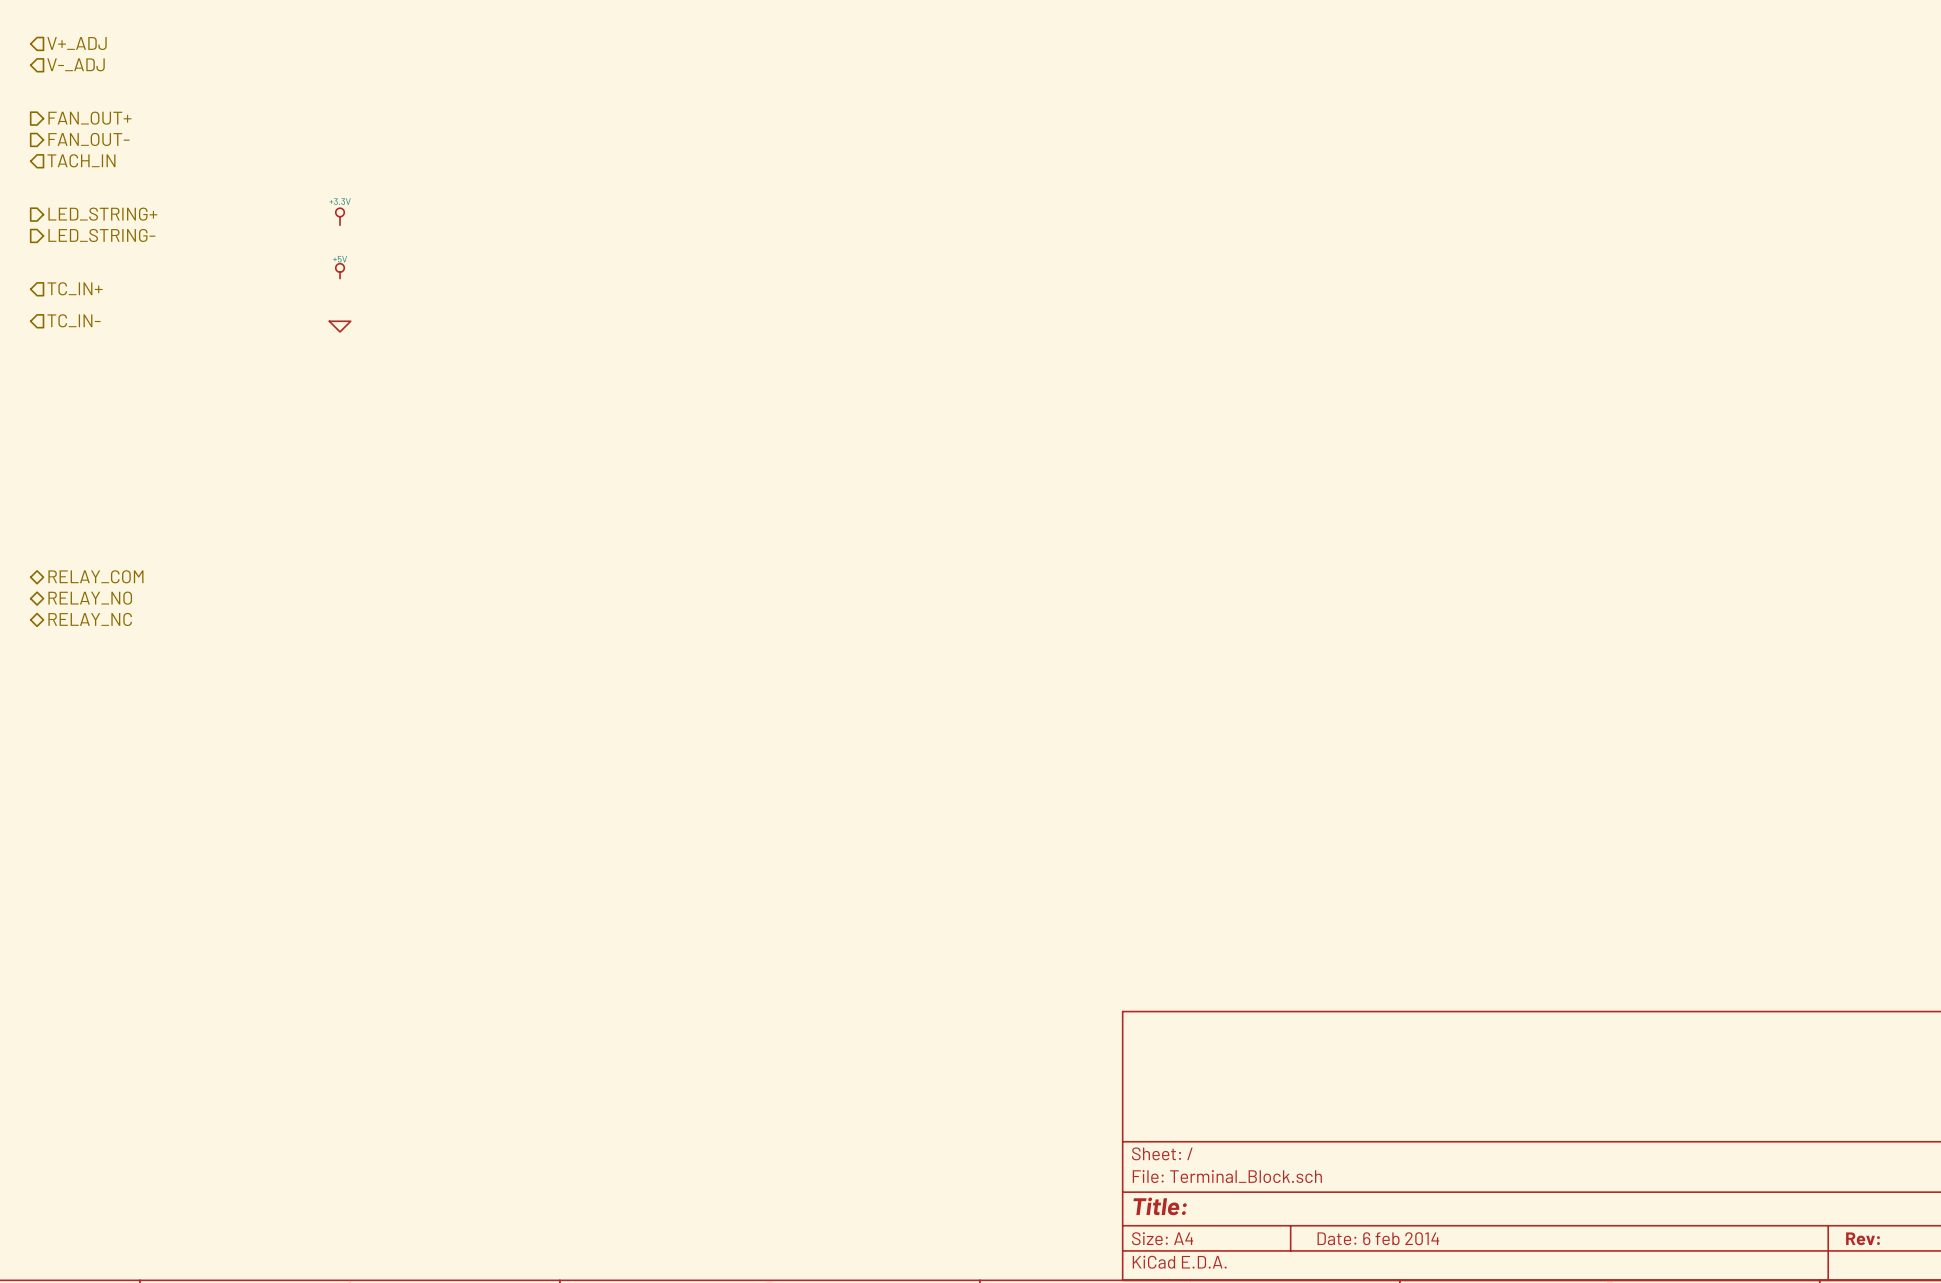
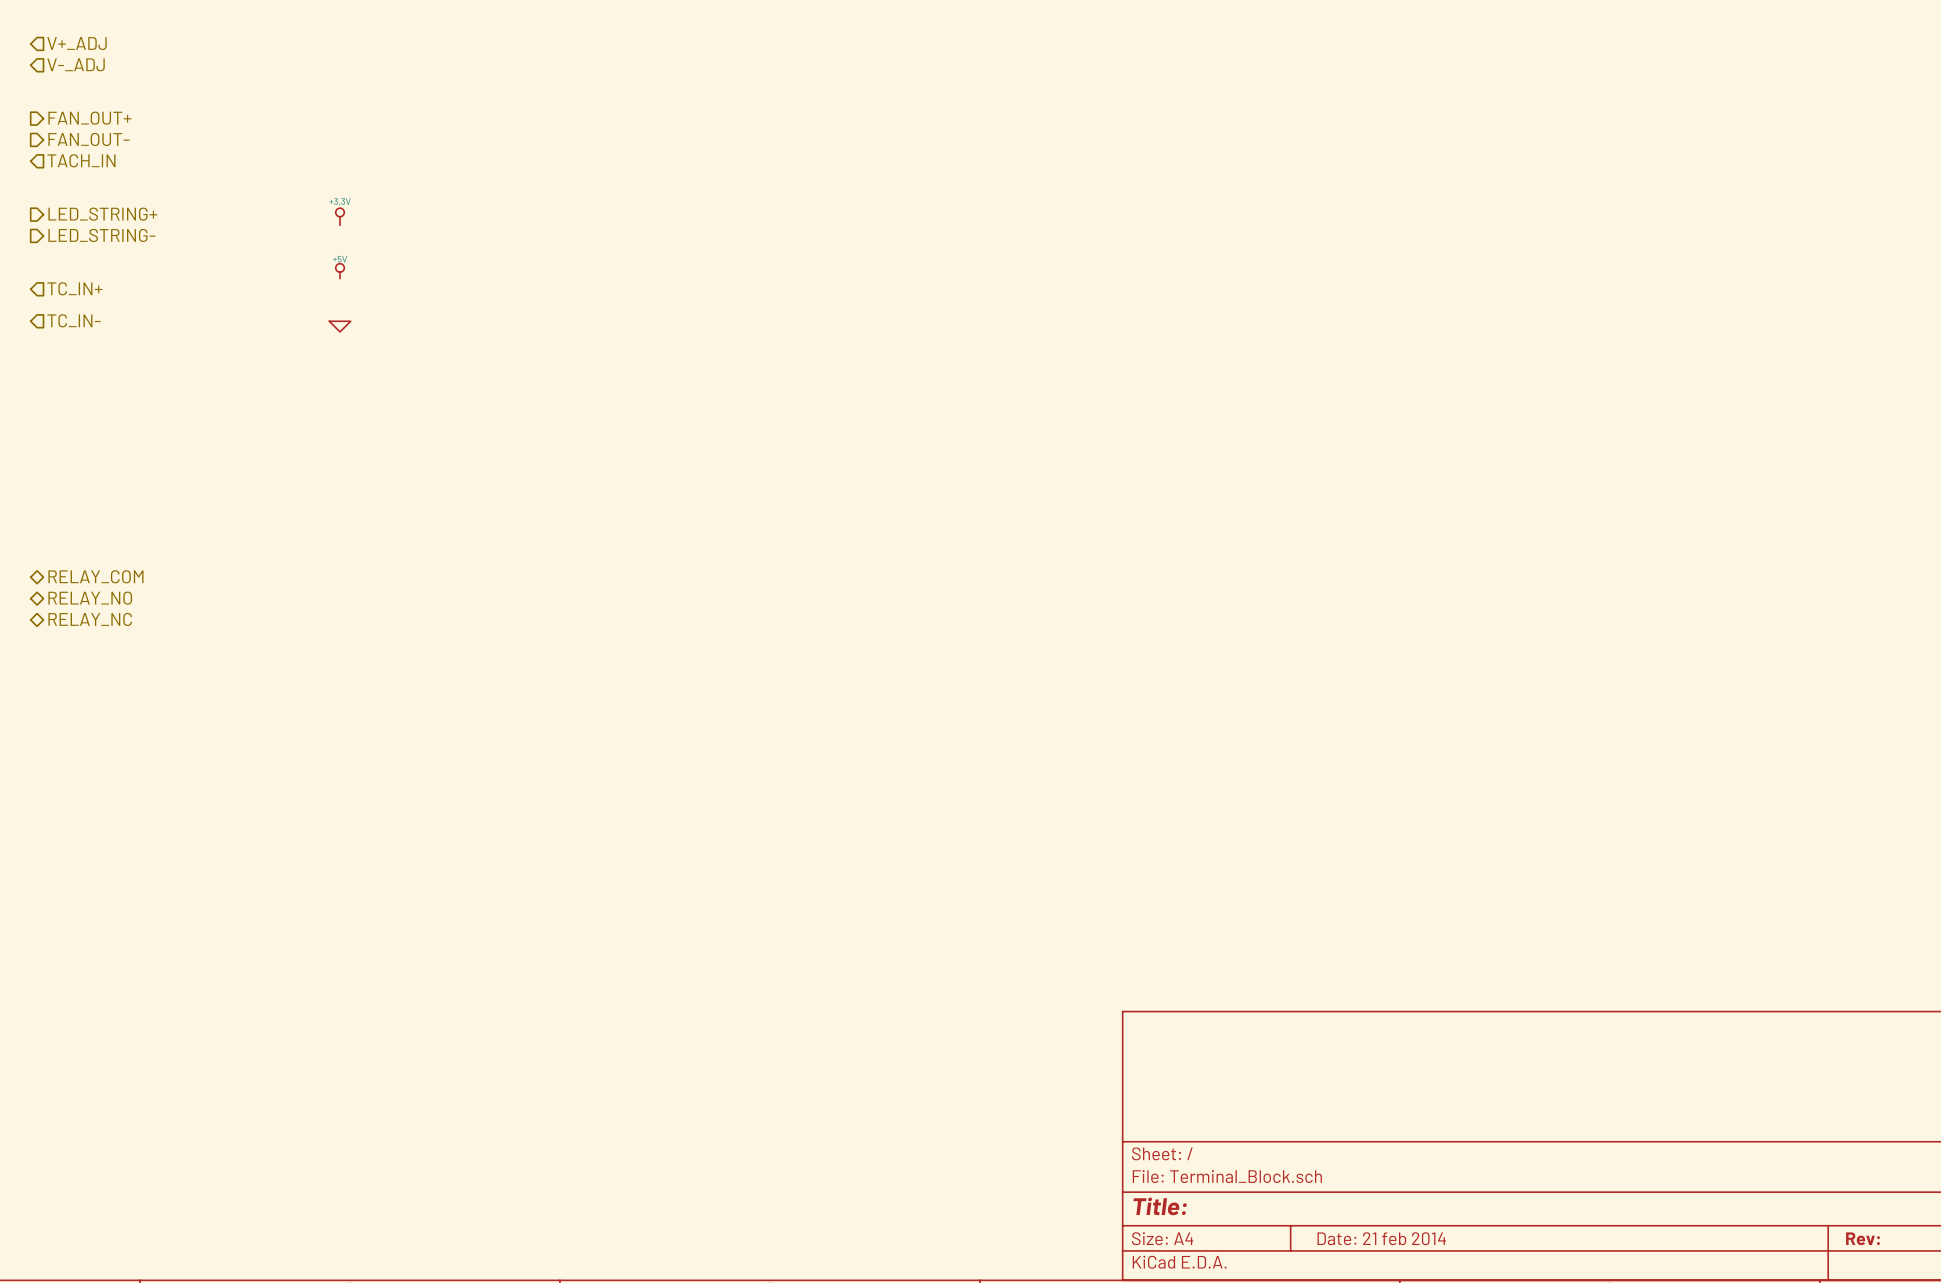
title block: Date: 6 feb 2014 (1378, 1238) -> Date: 21 feb 2014 (1381, 1238)

